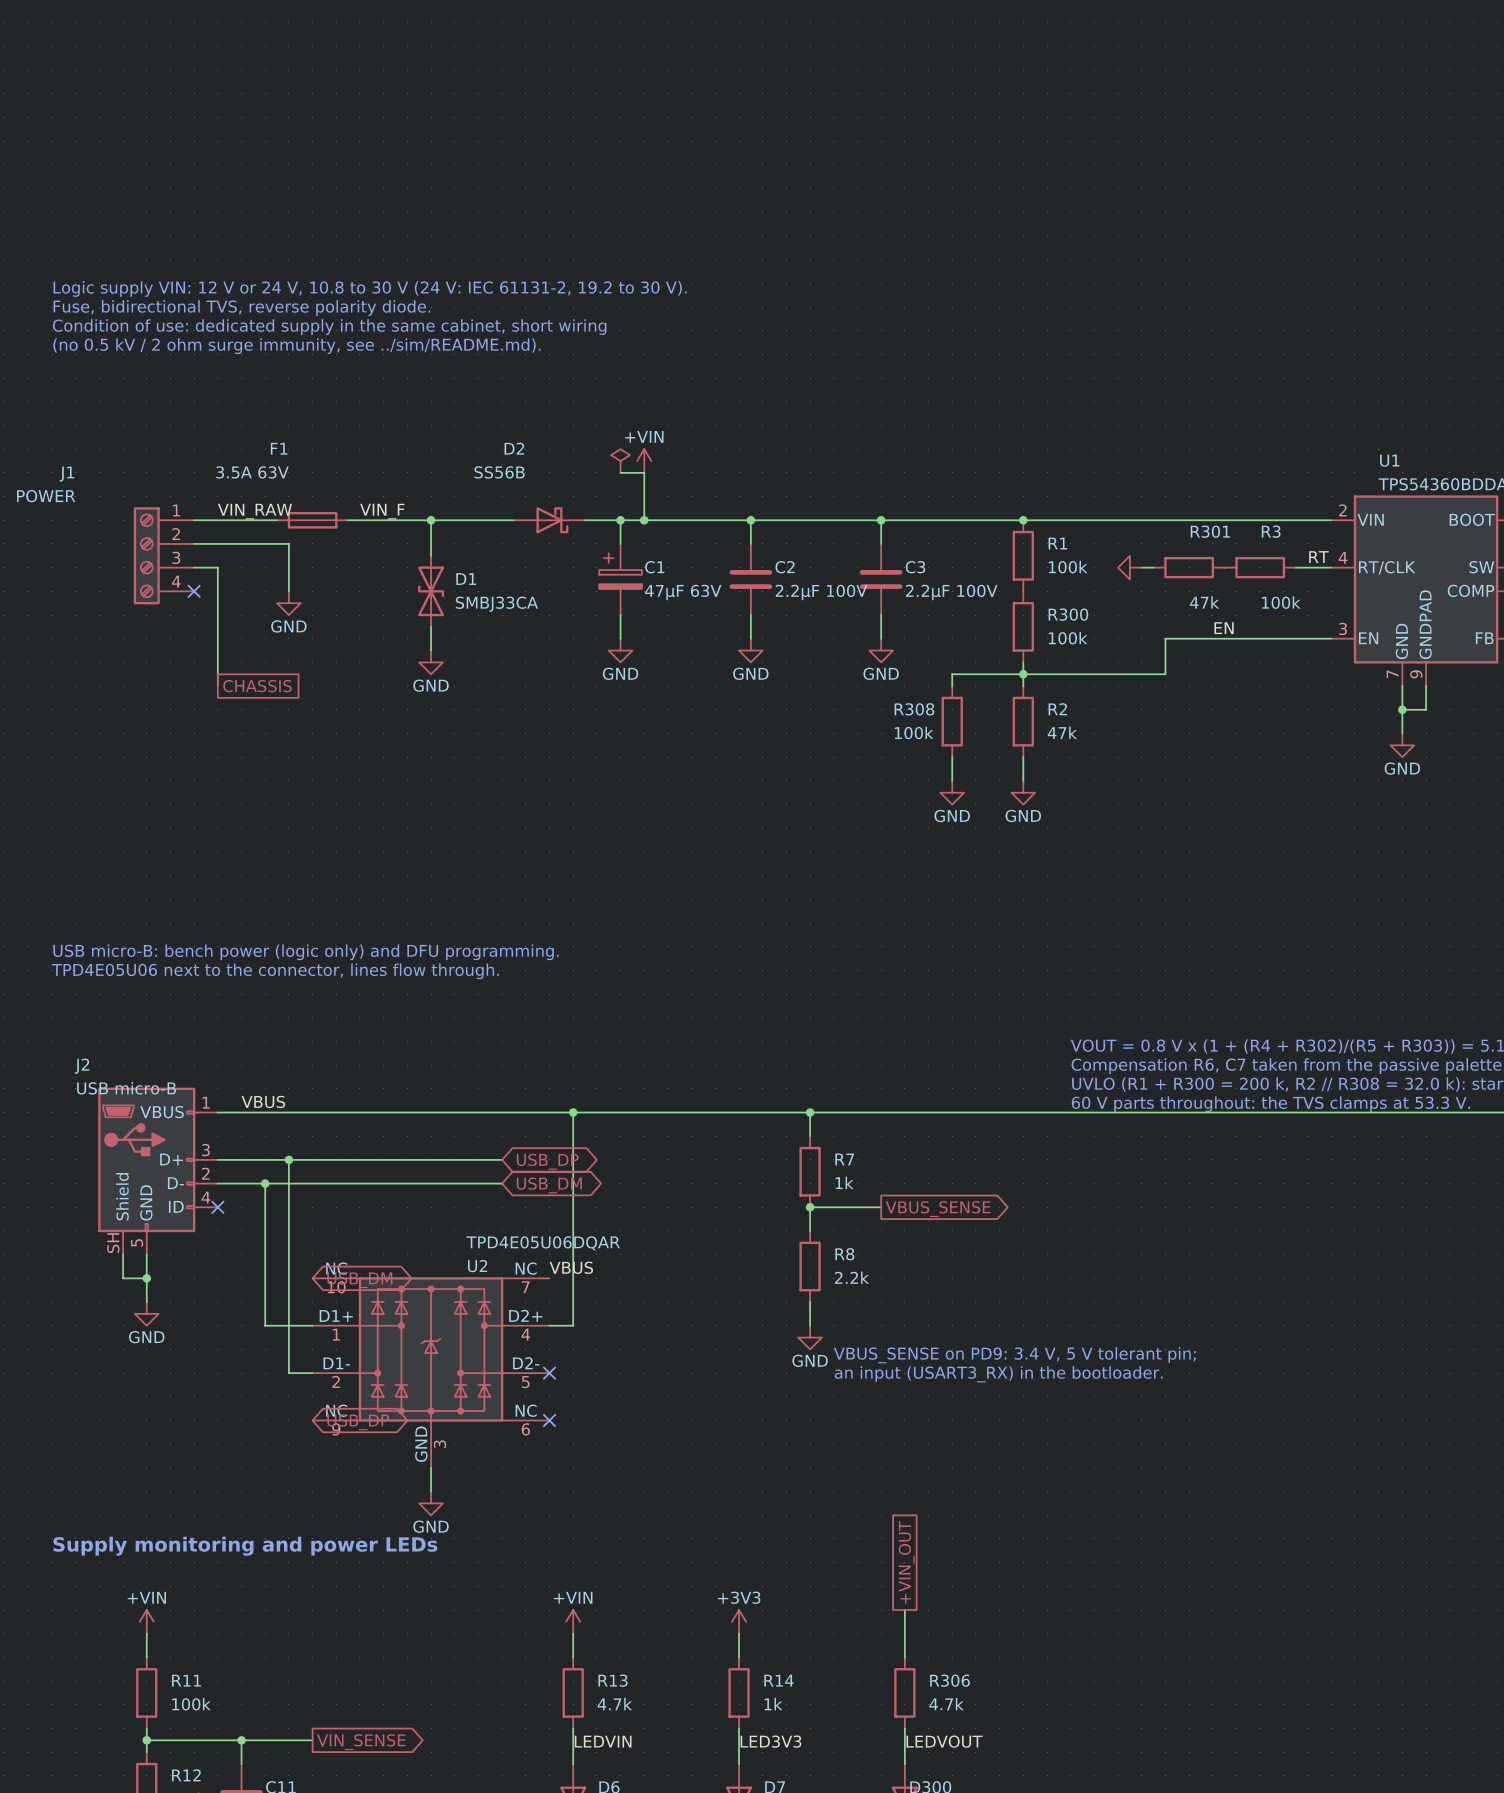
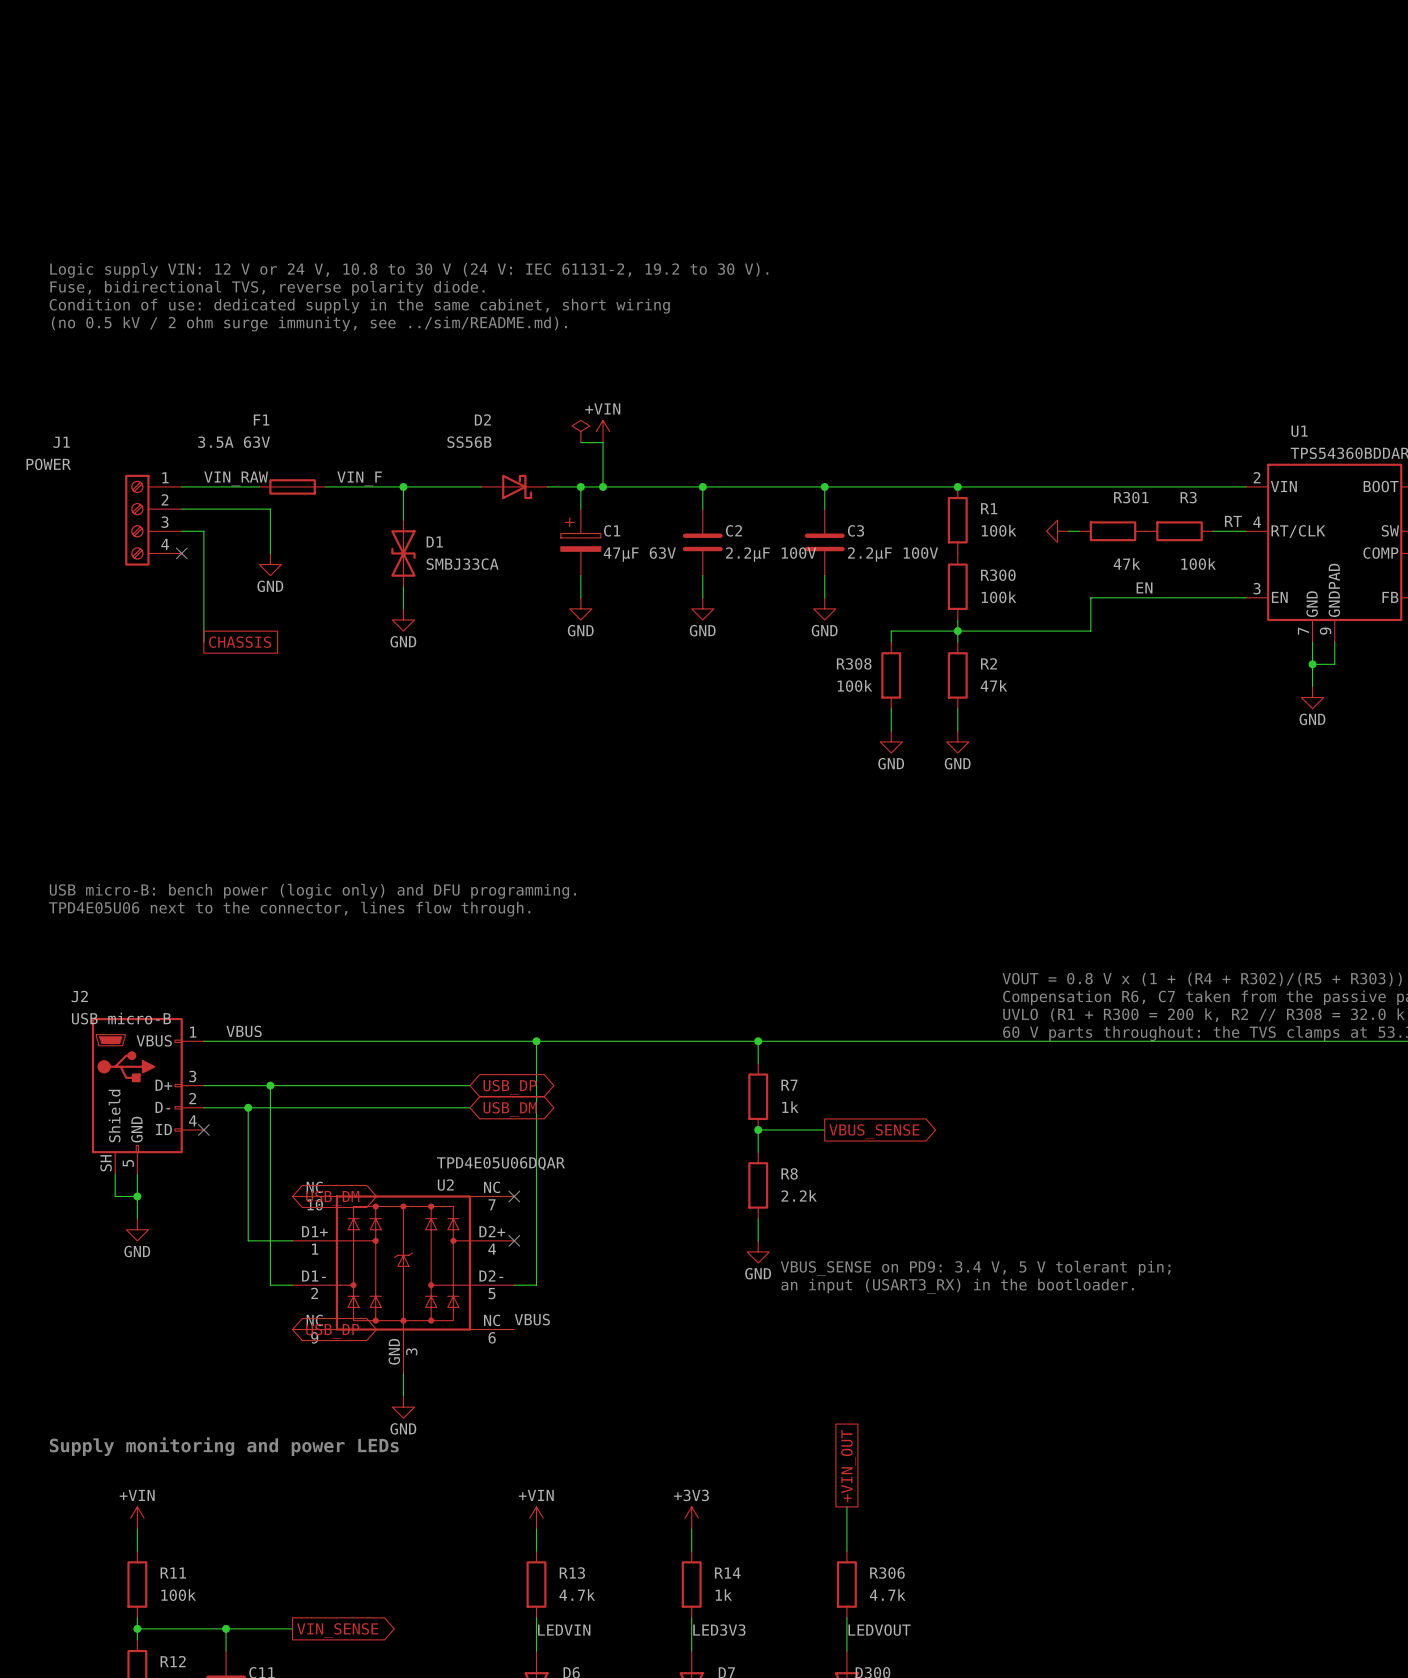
label position: VBUS (571, 1267) -> VBUS (532, 1319)
no-connect mark: none -> (514, 1196)
wire: (549, 1325) (573, 1325) -> (514, 1285) (536, 1285) (536, 1240)
no-connect mark: none -> (514, 1240)
no-connect mark: (549, 1373) -> none
no-connect mark: (549, 1420) -> none

